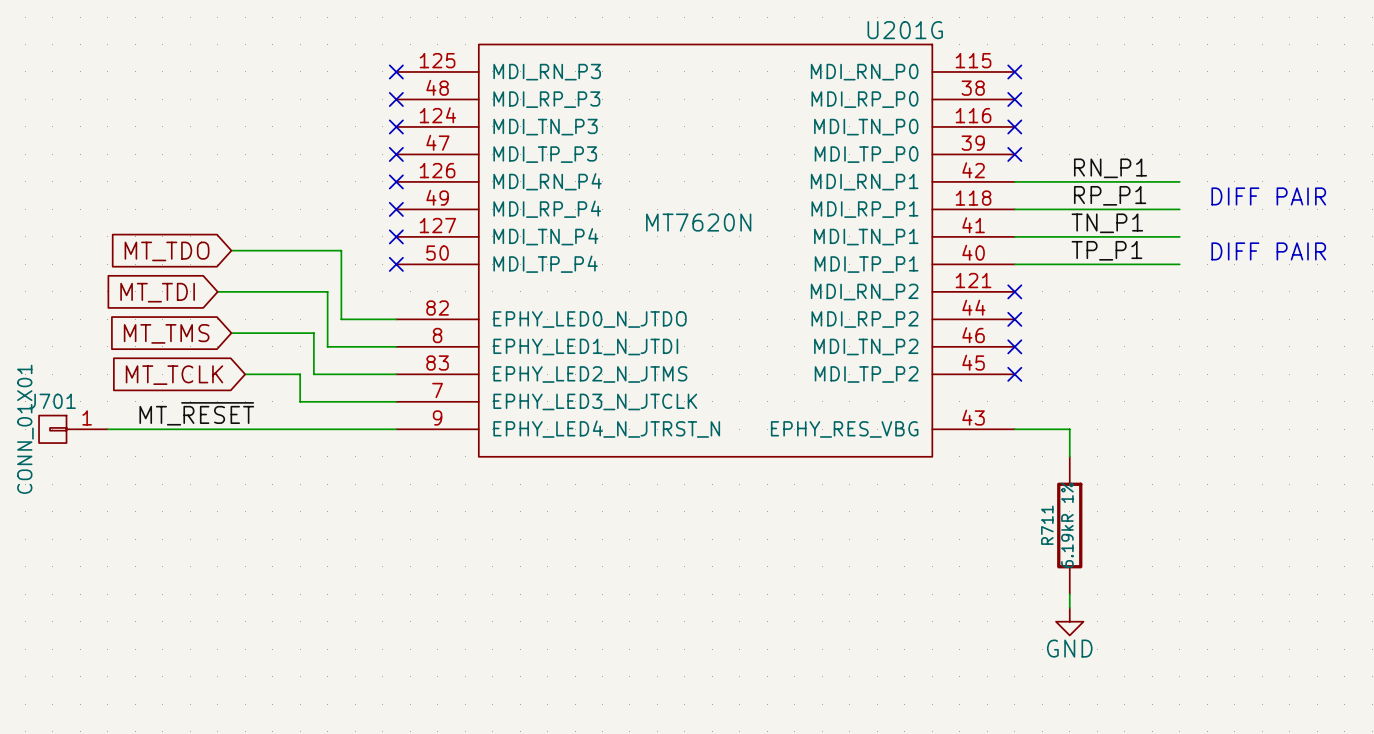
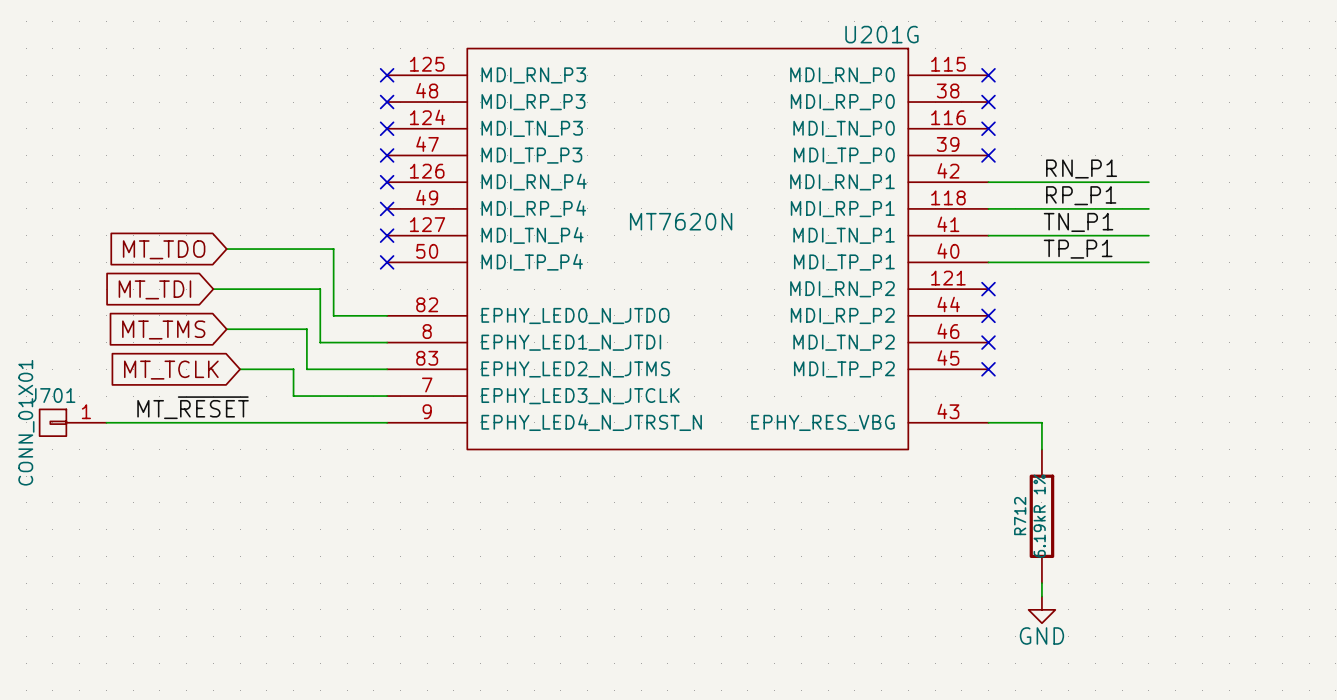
text: DIFF PAIR (1268, 196) -> none
text: DIFF PAIR (1268, 251) -> none
R711 name: R711 (1047, 525) -> R712 (1020, 516)

